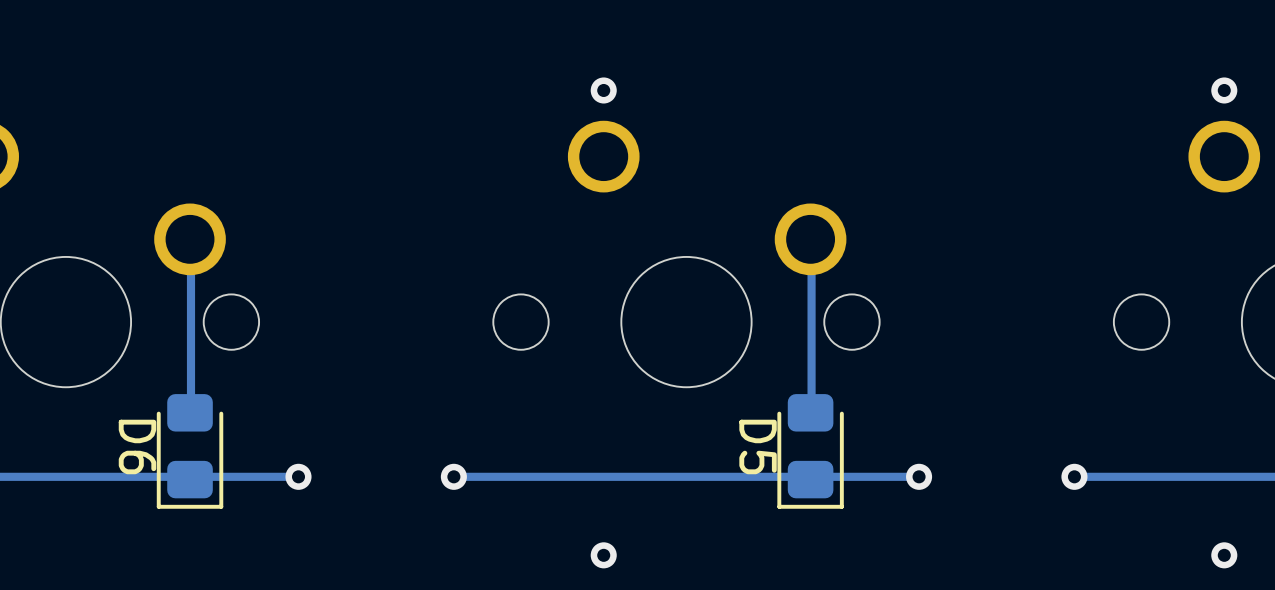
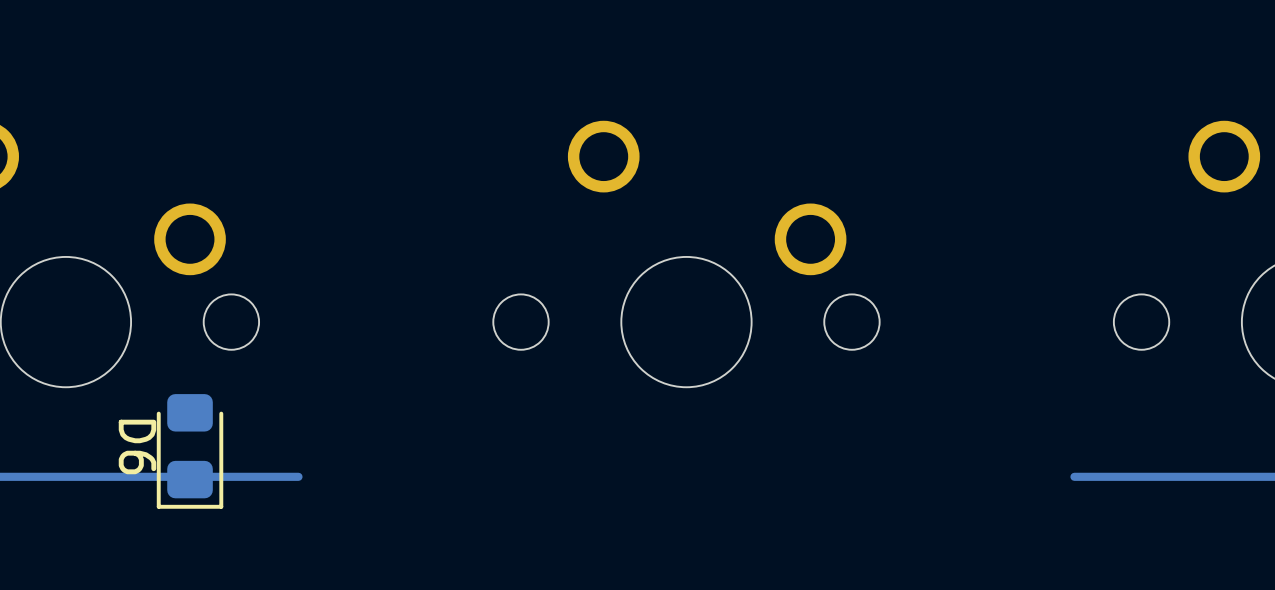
via: (603, 90) -> none
via: (1224, 90) -> none
track: (191, 239) (191, 409) -> none
track: (811, 239) (811, 409) -> none
D5: (810, 451) -> none
via: (298, 476) -> none
via: (453, 476) -> none
track: (919, 476) (453, 476) -> none
via: (919, 476) -> none
via: (1074, 476) -> none
via: (603, 555) -> none
via: (1224, 555) -> none

